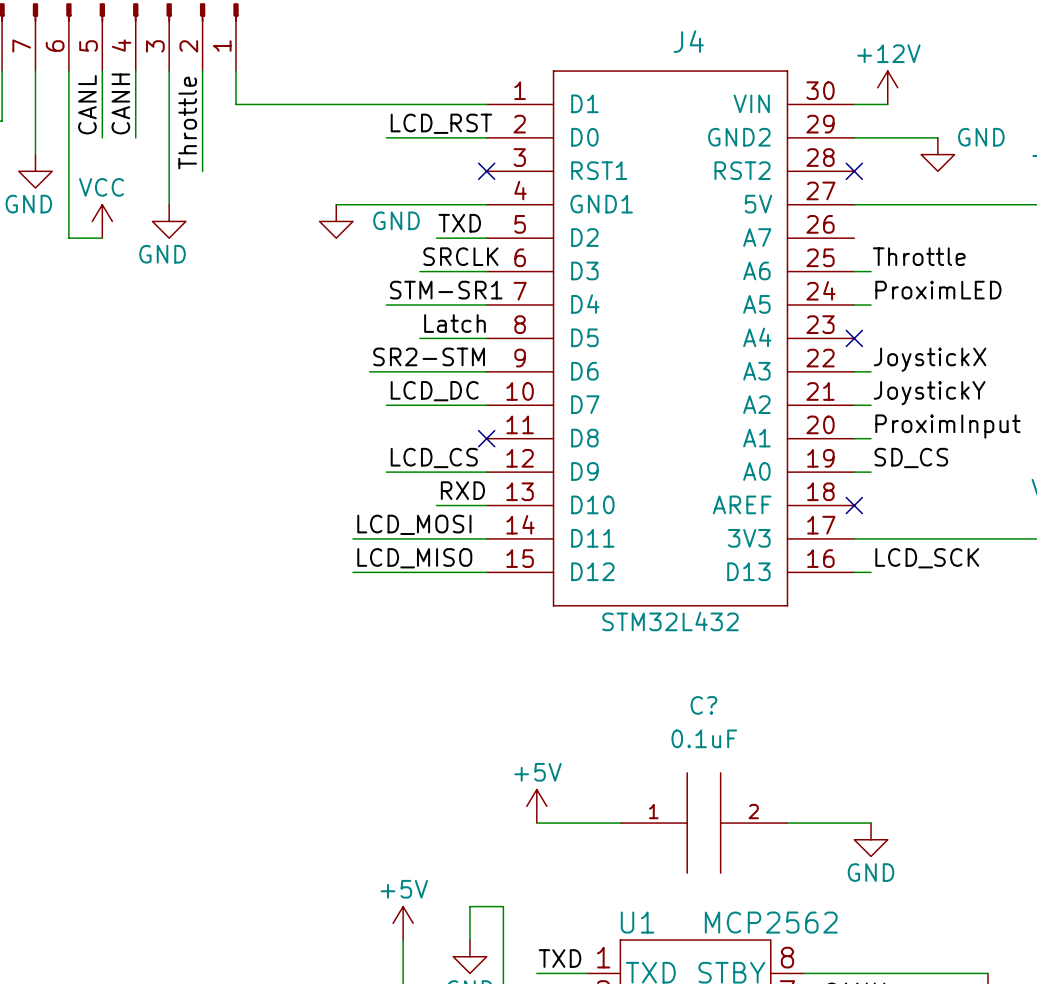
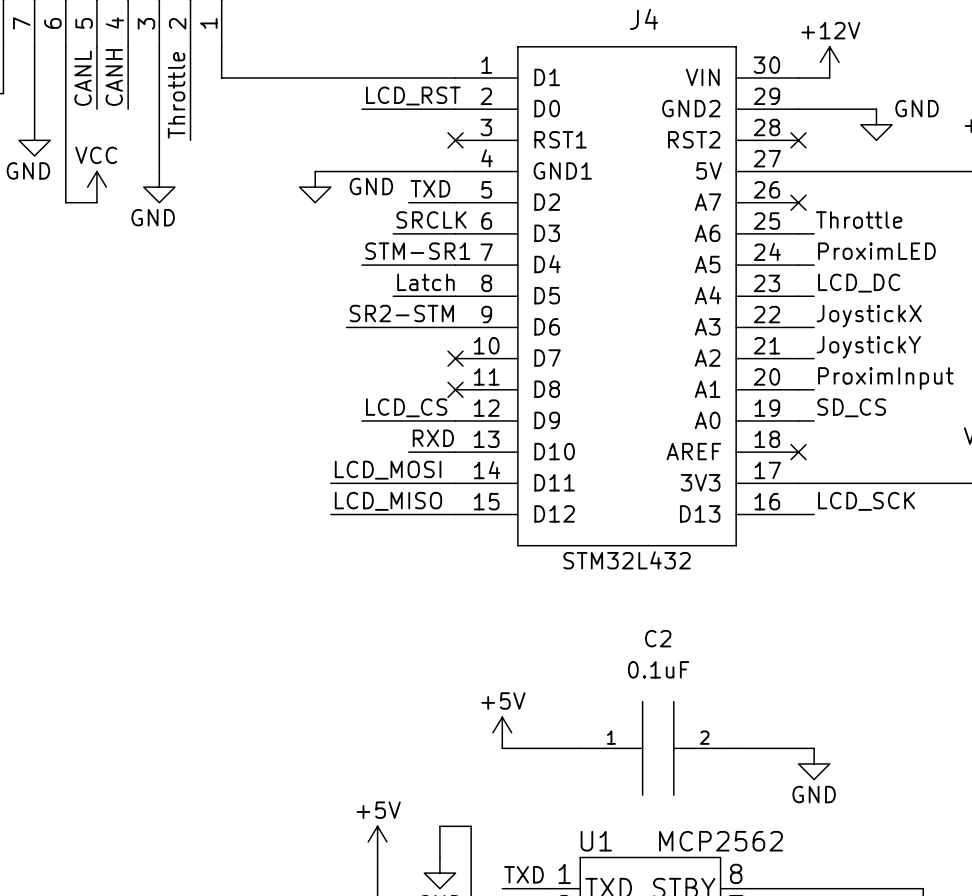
no-connect mark: none -> (798, 202)
label: none -> LCD_DC (859, 283)
wire: none -> (798, 296) (814, 296)
no-connect mark: (854, 338) -> none
label: LCD_DC (434, 391) -> none
wire: (386, 405) (486, 405) -> none
no-connect mark: none -> (455, 358)
C? name: C? (703, 705) -> C2 (658, 638)

